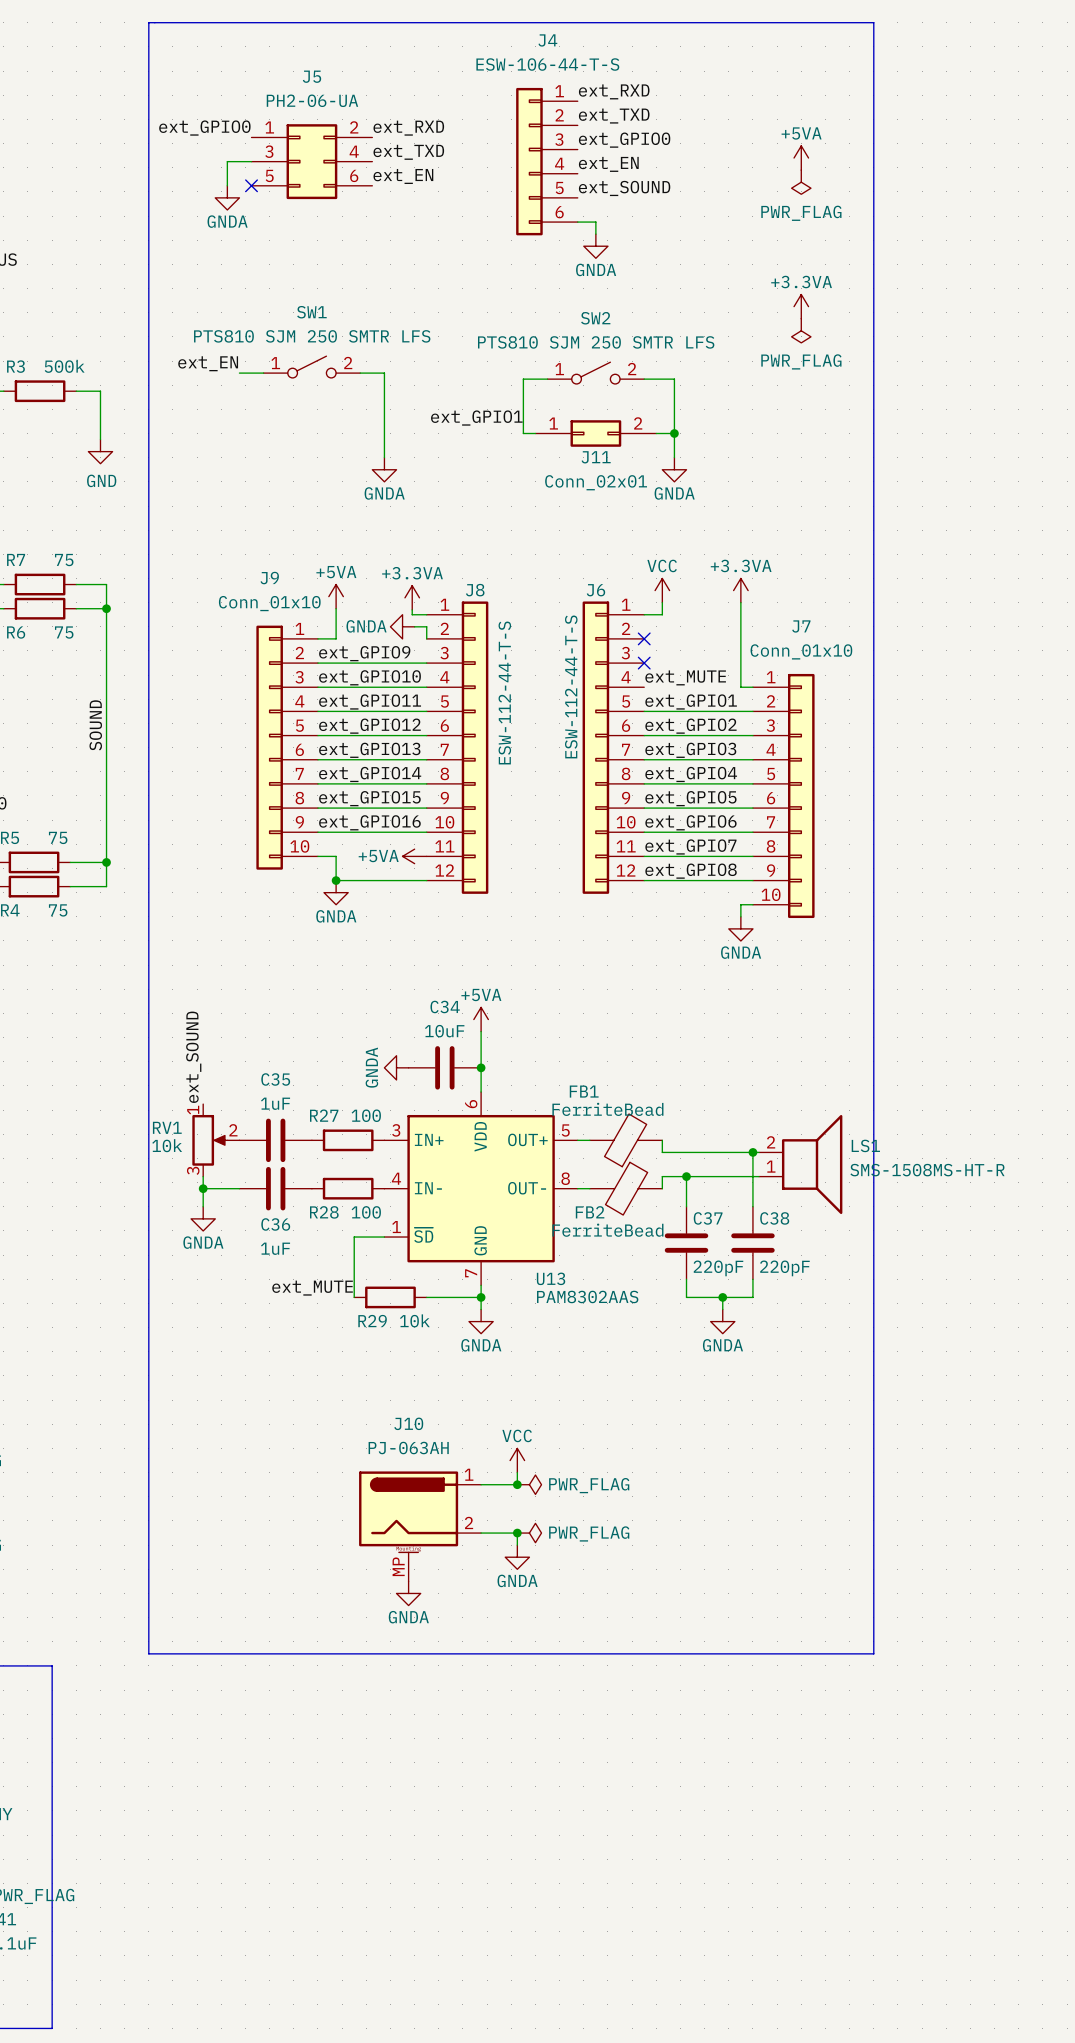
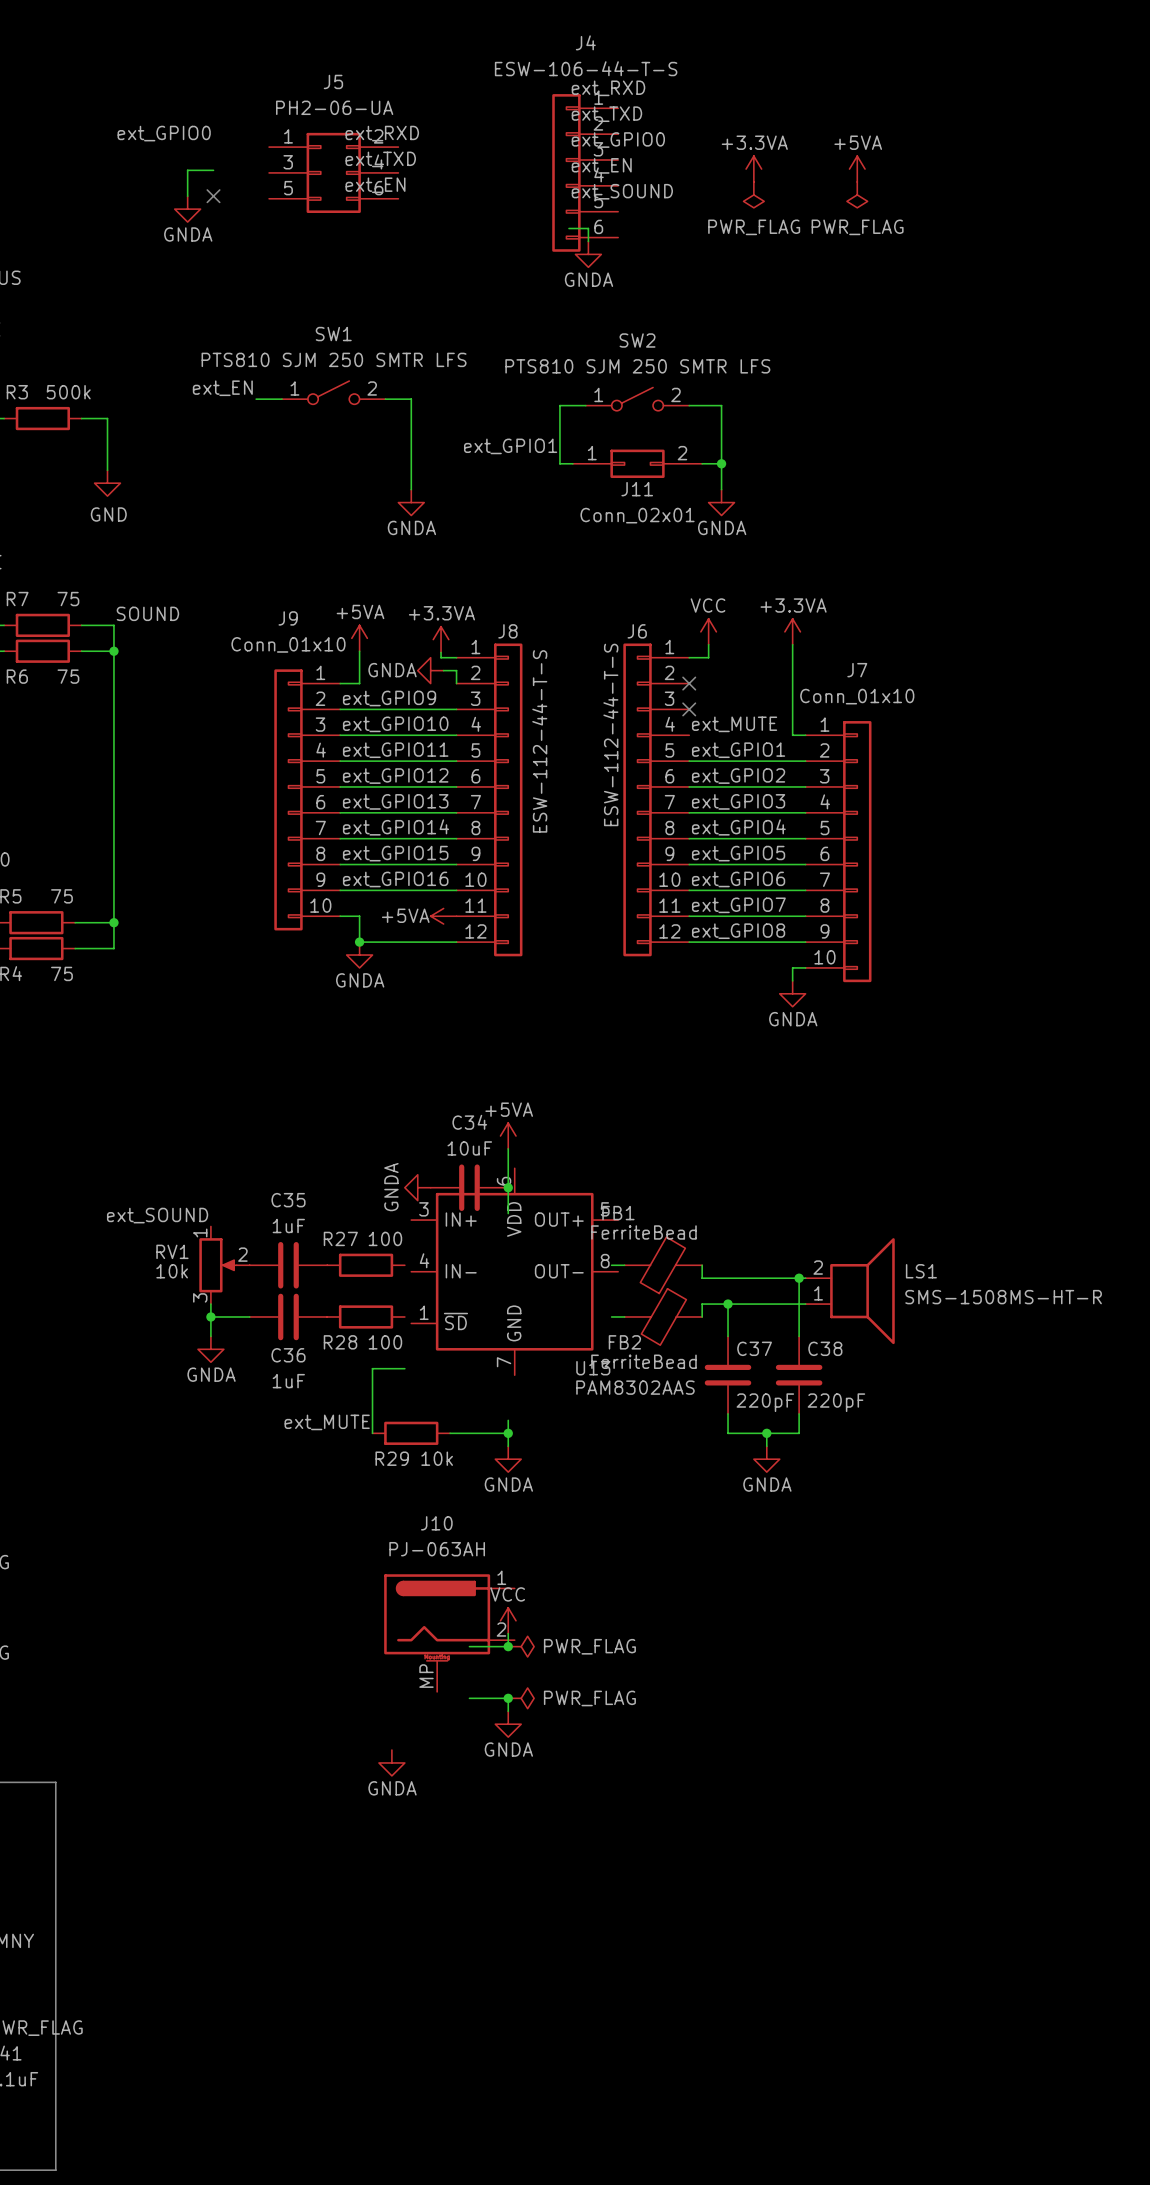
line: (148, 22) (873, 22) (873, 1653) (148, 1653) (148, 22) -> none
label position: ext_RXD (614, 91) -> ext_RXD (608, 88)
label position: ext_TXD (614, 116) -> ext_TXD (606, 114)
label position: ext_GPIO0 (204, 128) -> ext_GPIO0 (164, 133)
label position: ext_RXD (408, 128) -> ext_RXD (382, 133)
label position: ext_GPIO0 (624, 140) -> ext_GPIO0 (618, 140)
label position: ext_TXD (408, 152) -> ext_TXD (380, 159)
wire: (251, 161) (227, 161) (227, 185) -> (213, 170) (187, 170) (187, 196)
label position: ext_EN (608, 164) -> ext_EN (601, 165)
label position: ext_EN (403, 176) -> ext_EN (375, 185)
no-connect mark position: (251, 185) -> (213, 196)
label position: ext_SOUND (624, 188) -> ext_SOUND (622, 191)
power symbol position: GNDA (227, 197) -> GNDA (187, 209)
wire: (577, 222) (595, 222) (595, 234) -> (569, 228) (588, 228) (588, 241)
power symbol position: GNDA (595, 246) -> GNDA (588, 254)
power symbol position: +3.3VA (801, 306) -> +3.3VA (753, 169)
power symbol position: PWR_FLAG (801, 330) -> PWR_FLAG (753, 194)
label rotation: 0° (95, 725) -> 90° clockwise (147, 613)
label position: SOUND (95, 725) -> SOUND (147, 613)
power symbol position: +5VA (481, 1019) -> +5VA (508, 1136)
wire: (481, 1031) (481, 1092) -> (508, 1148) (508, 1213)
label rotation: 0° (193, 1057) -> 90° clockwise (157, 1215)
power symbol position: GNDA (396, 1067) -> GNDA (417, 1187)
C34 position: (444, 1067) -> (469, 1187)
junction position: (481, 1067) -> (508, 1187)
RV1 position: (215, 1140) -> (224, 1265)
C35 position: (275, 1140) -> (288, 1265)
R27 position: (348, 1140) -> (366, 1265)
wire: (577, 1140) (589, 1140) -> (611, 1265) (624, 1265)
FB1 position: (626, 1140) -> (663, 1265)
wire: (662, 1140) (662, 1152) (759, 1152) -> (702, 1265) (702, 1278) (805, 1278)
wire: (752, 1152) (752, 1206) -> (799, 1278) (799, 1336)
junction: (752, 1152) -> none
LS1 position: (800, 1164) -> (850, 1291)
wire: (203, 1176) (203, 1206) -> (210, 1304) (210, 1336)
wire: (686, 1176) (686, 1206) -> (728, 1304) (728, 1336)
junction: (686, 1176) -> none
wire: (759, 1176) (662, 1176) (662, 1188) -> (805, 1304) (702, 1304) (702, 1316)
wire: (203, 1188) (239, 1188) -> (210, 1316) (249, 1316)
junction position: (203, 1188) -> (210, 1316)
C36 position: (275, 1188) -> (288, 1316)
R28 position: (348, 1188) -> (366, 1316)
wire: (577, 1188) (589, 1188) -> (611, 1316) (624, 1316)
FB2 position: (626, 1188) -> (663, 1316)
junction: none -> (799, 1278)
power symbol position: GNDA (203, 1218) -> GNDA (210, 1349)
junction: none -> (728, 1304)
wire: (384, 1237) (354, 1237) (354, 1297) -> (404, 1368) (372, 1368) (372, 1433)
C37 position: (686, 1243) -> (728, 1375)
C38 position: (752, 1243) -> (799, 1375)
wire: (686, 1279) (686, 1297) (752, 1297) (752, 1279) -> (728, 1413) (728, 1433) (799, 1433) (799, 1413)
wire: (481, 1285) (481, 1309) -> (508, 1420) (508, 1446)
label position: ext_MUTE (312, 1288) -> ext_MUTE (327, 1422)
R29 position: (390, 1297) -> (411, 1433)
wire: (426, 1297) (481, 1297) -> (450, 1433) (508, 1433)
junction position: (481, 1297) -> (508, 1433)
wire: (722, 1297) (722, 1309) -> (766, 1433) (766, 1446)
junction position: (722, 1297) -> (766, 1433)
power symbol position: GNDA (481, 1321) -> GNDA (508, 1459)
power symbol position: GNDA (722, 1321) -> GNDA (766, 1459)
power symbol position: VCC (517, 1460) -> VCC (508, 1620)
wire: (517, 1472) (517, 1484) (481, 1484) -> (508, 1633) (508, 1646) (469, 1646)
junction: (517, 1484) -> none
power symbol: PWR_FLAG (529, 1484) -> none
wire: (481, 1533) (517, 1533) (517, 1545) -> (469, 1698) (508, 1698) (508, 1711)
junction: (517, 1533) -> none
power symbol: PWR_FLAG (529, 1533) -> none
junction: none -> (508, 1646)
power symbol: none -> PWR_FLAG (521, 1646)
power symbol: GNDA (517, 1557) -> none
junction: none -> (508, 1698)
power symbol: none -> PWR_FLAG (521, 1698)
power symbol: GNDA (408, 1593) -> none
power symbol: none -> GNDA (508, 1724)
power symbol: none -> GNDA (391, 1762)

